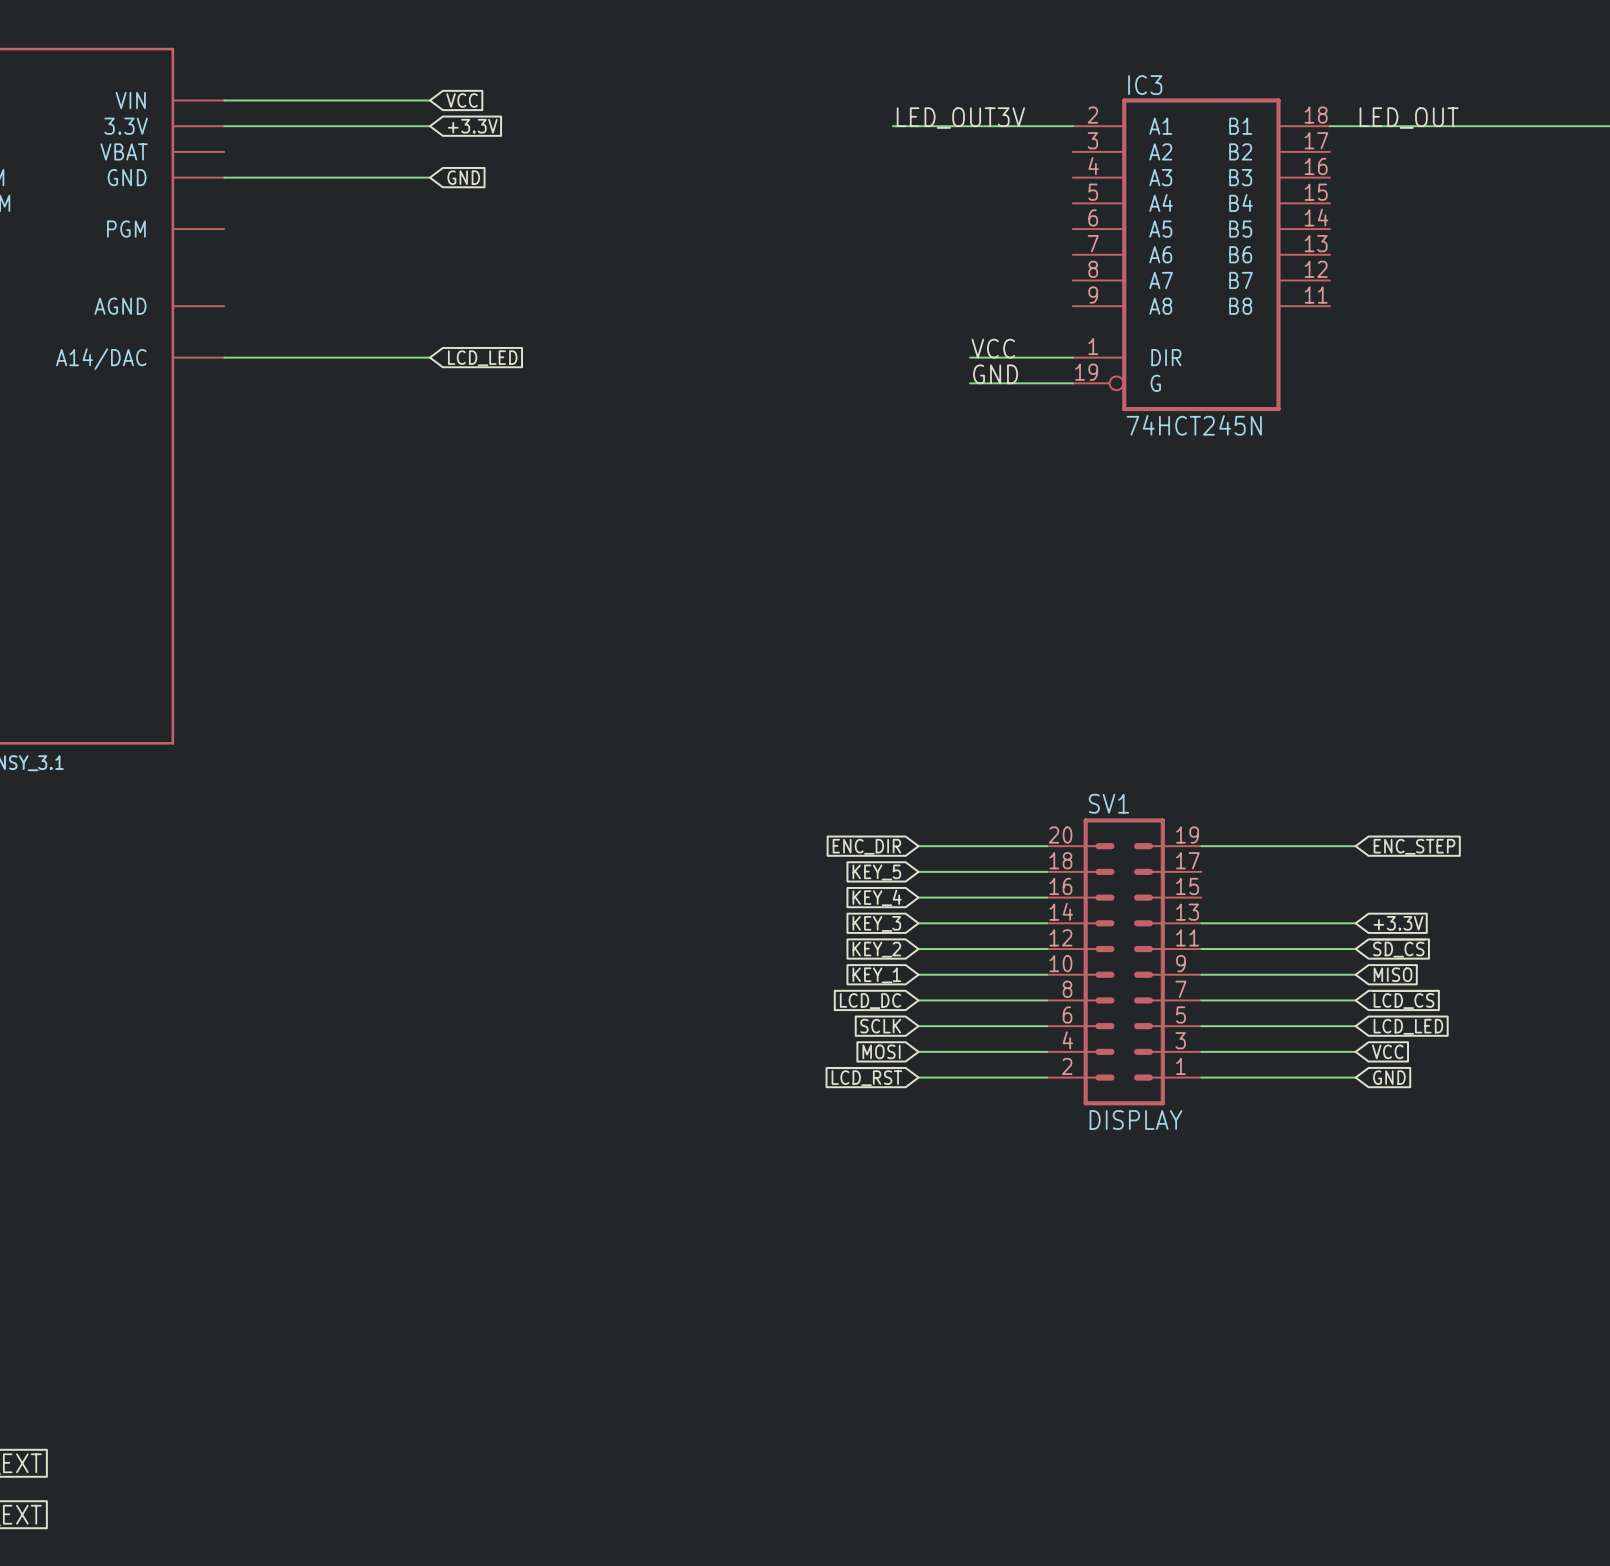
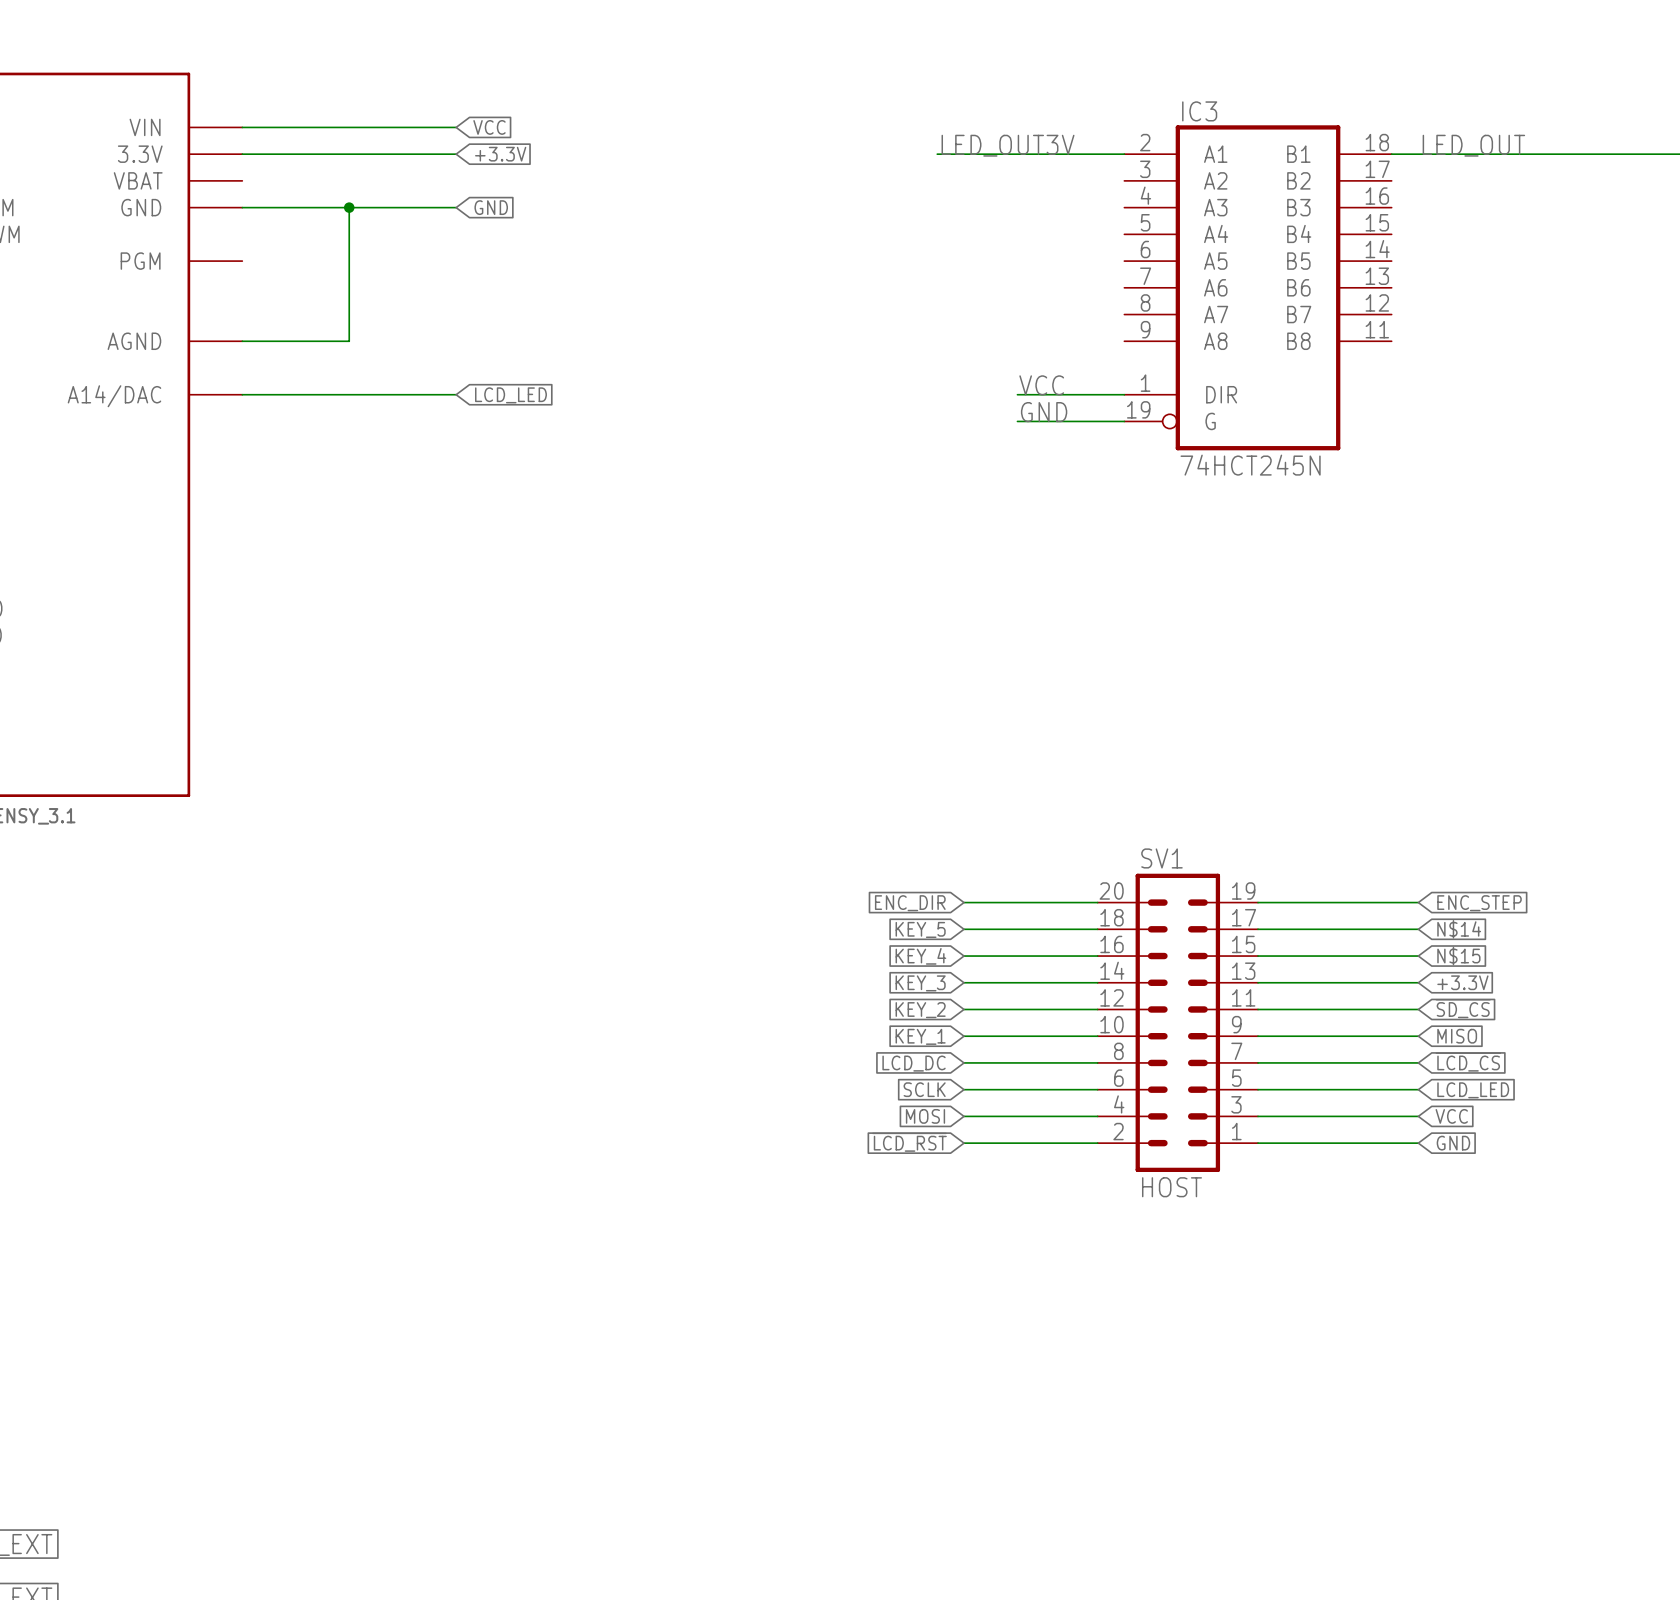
wire: none -> (349, 207) (349, 341) (242, 341)
junction: none -> (349, 207)
wire: none -> (1258, 929) (1418, 929)
global label: none -> N$14 (1459, 929)
wire: none -> (1258, 956) (1418, 956)
global label: none -> N$15 (1458, 956)
SV1 value: DISPLAY (1135, 1120) -> HOST (1171, 1187)

